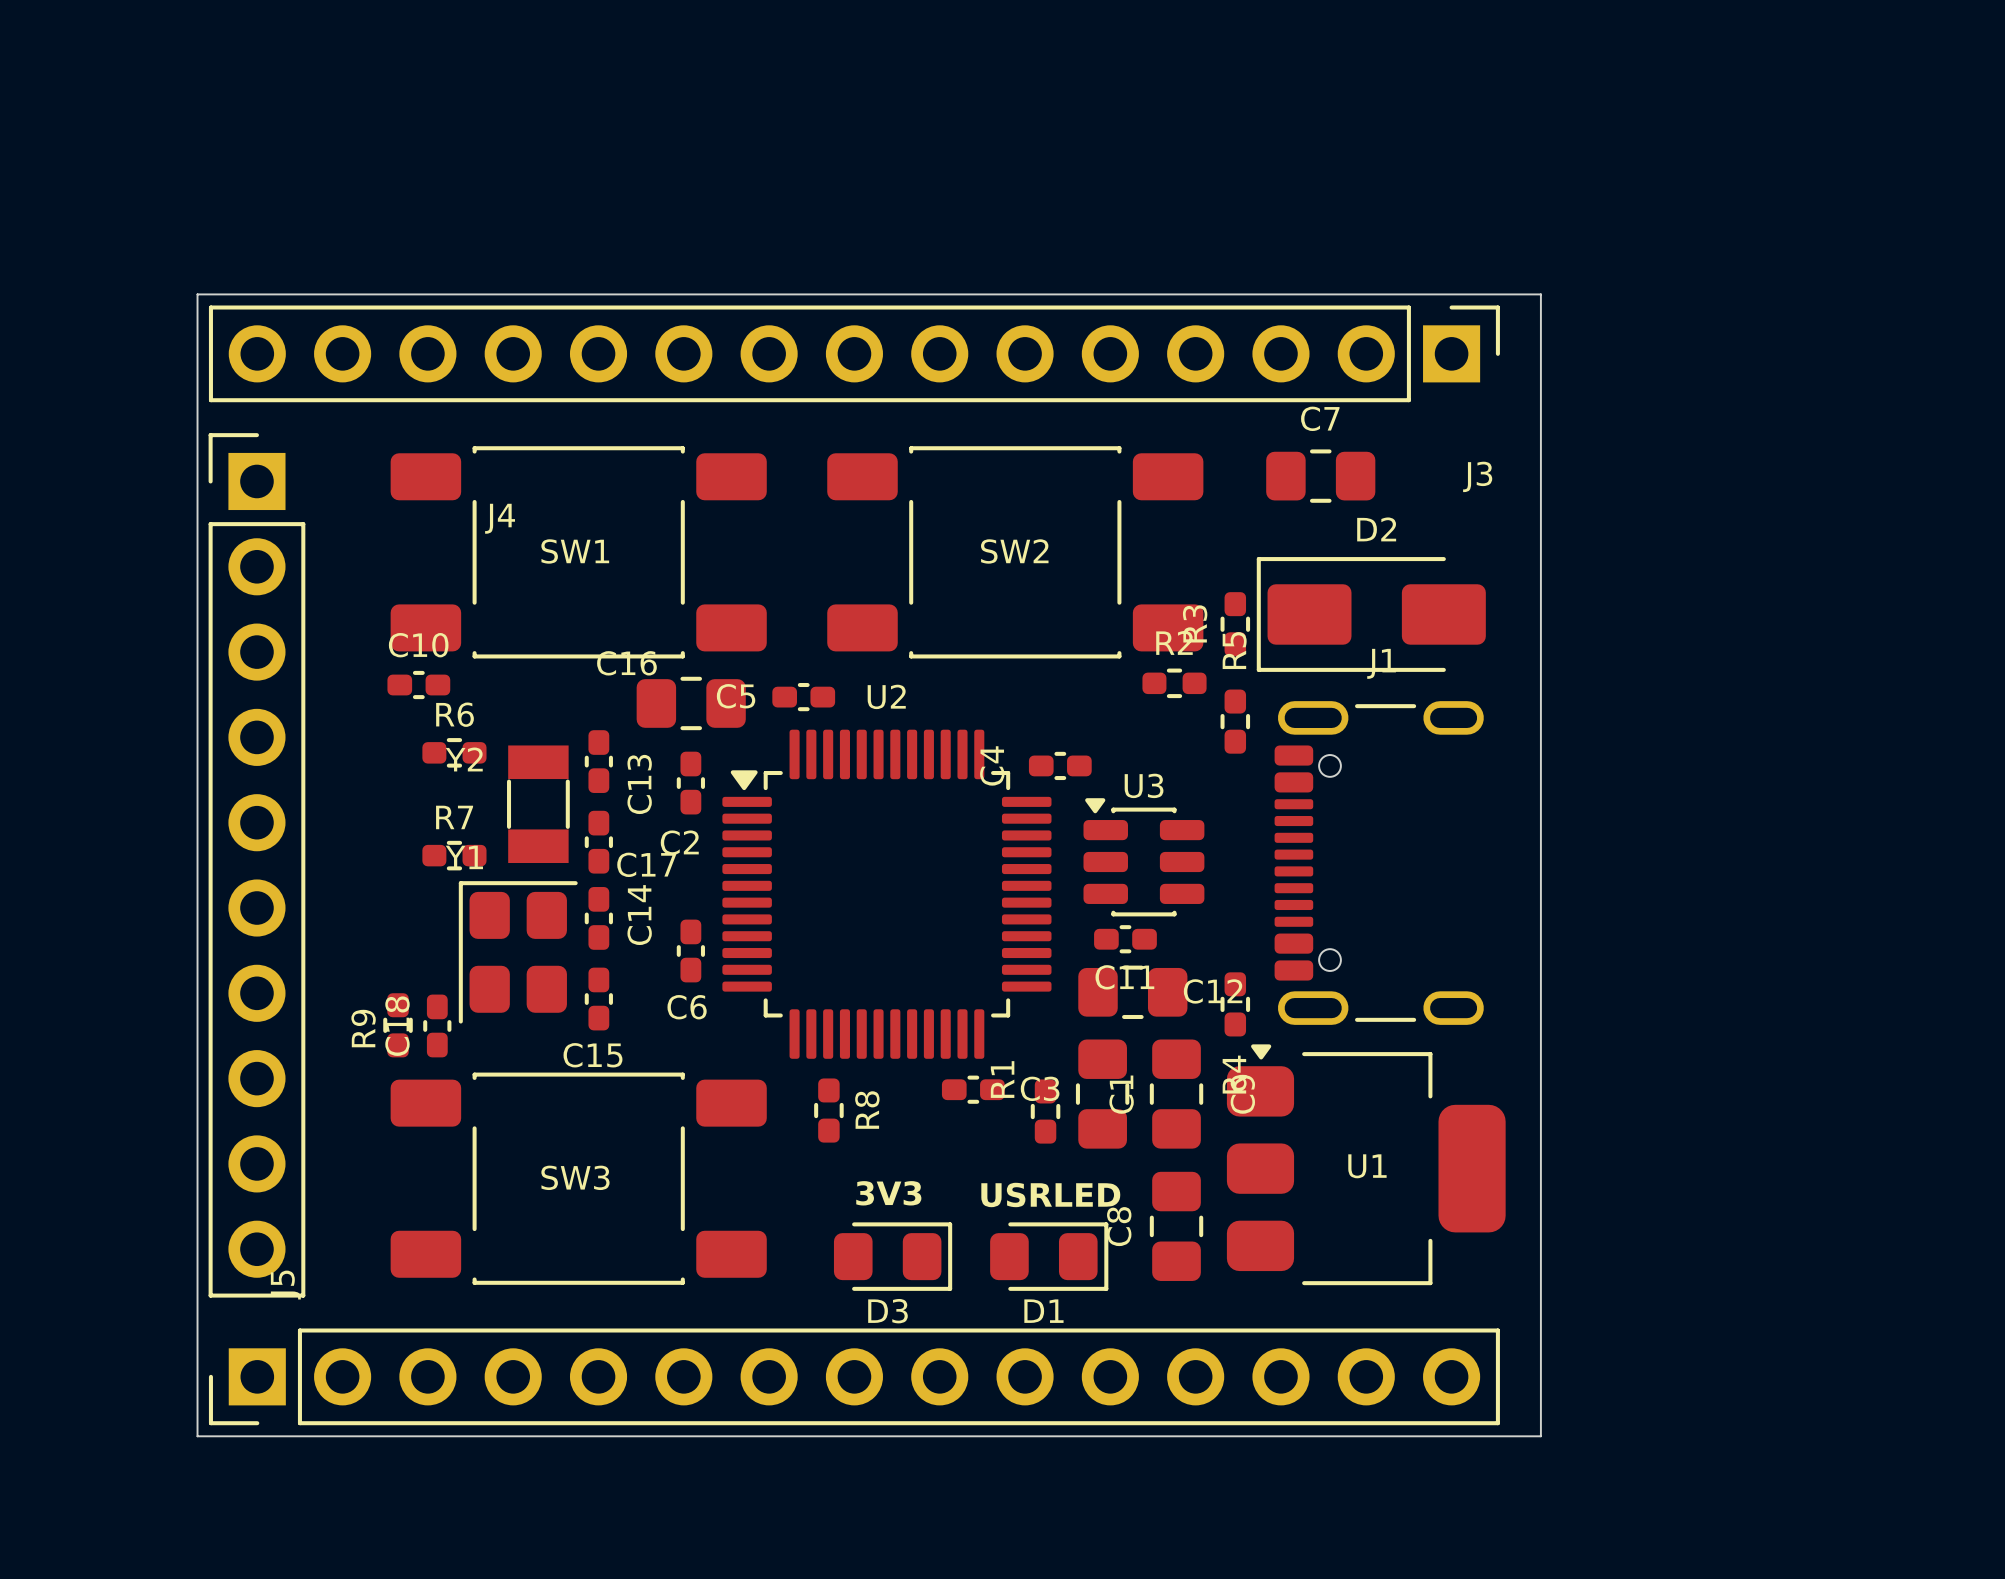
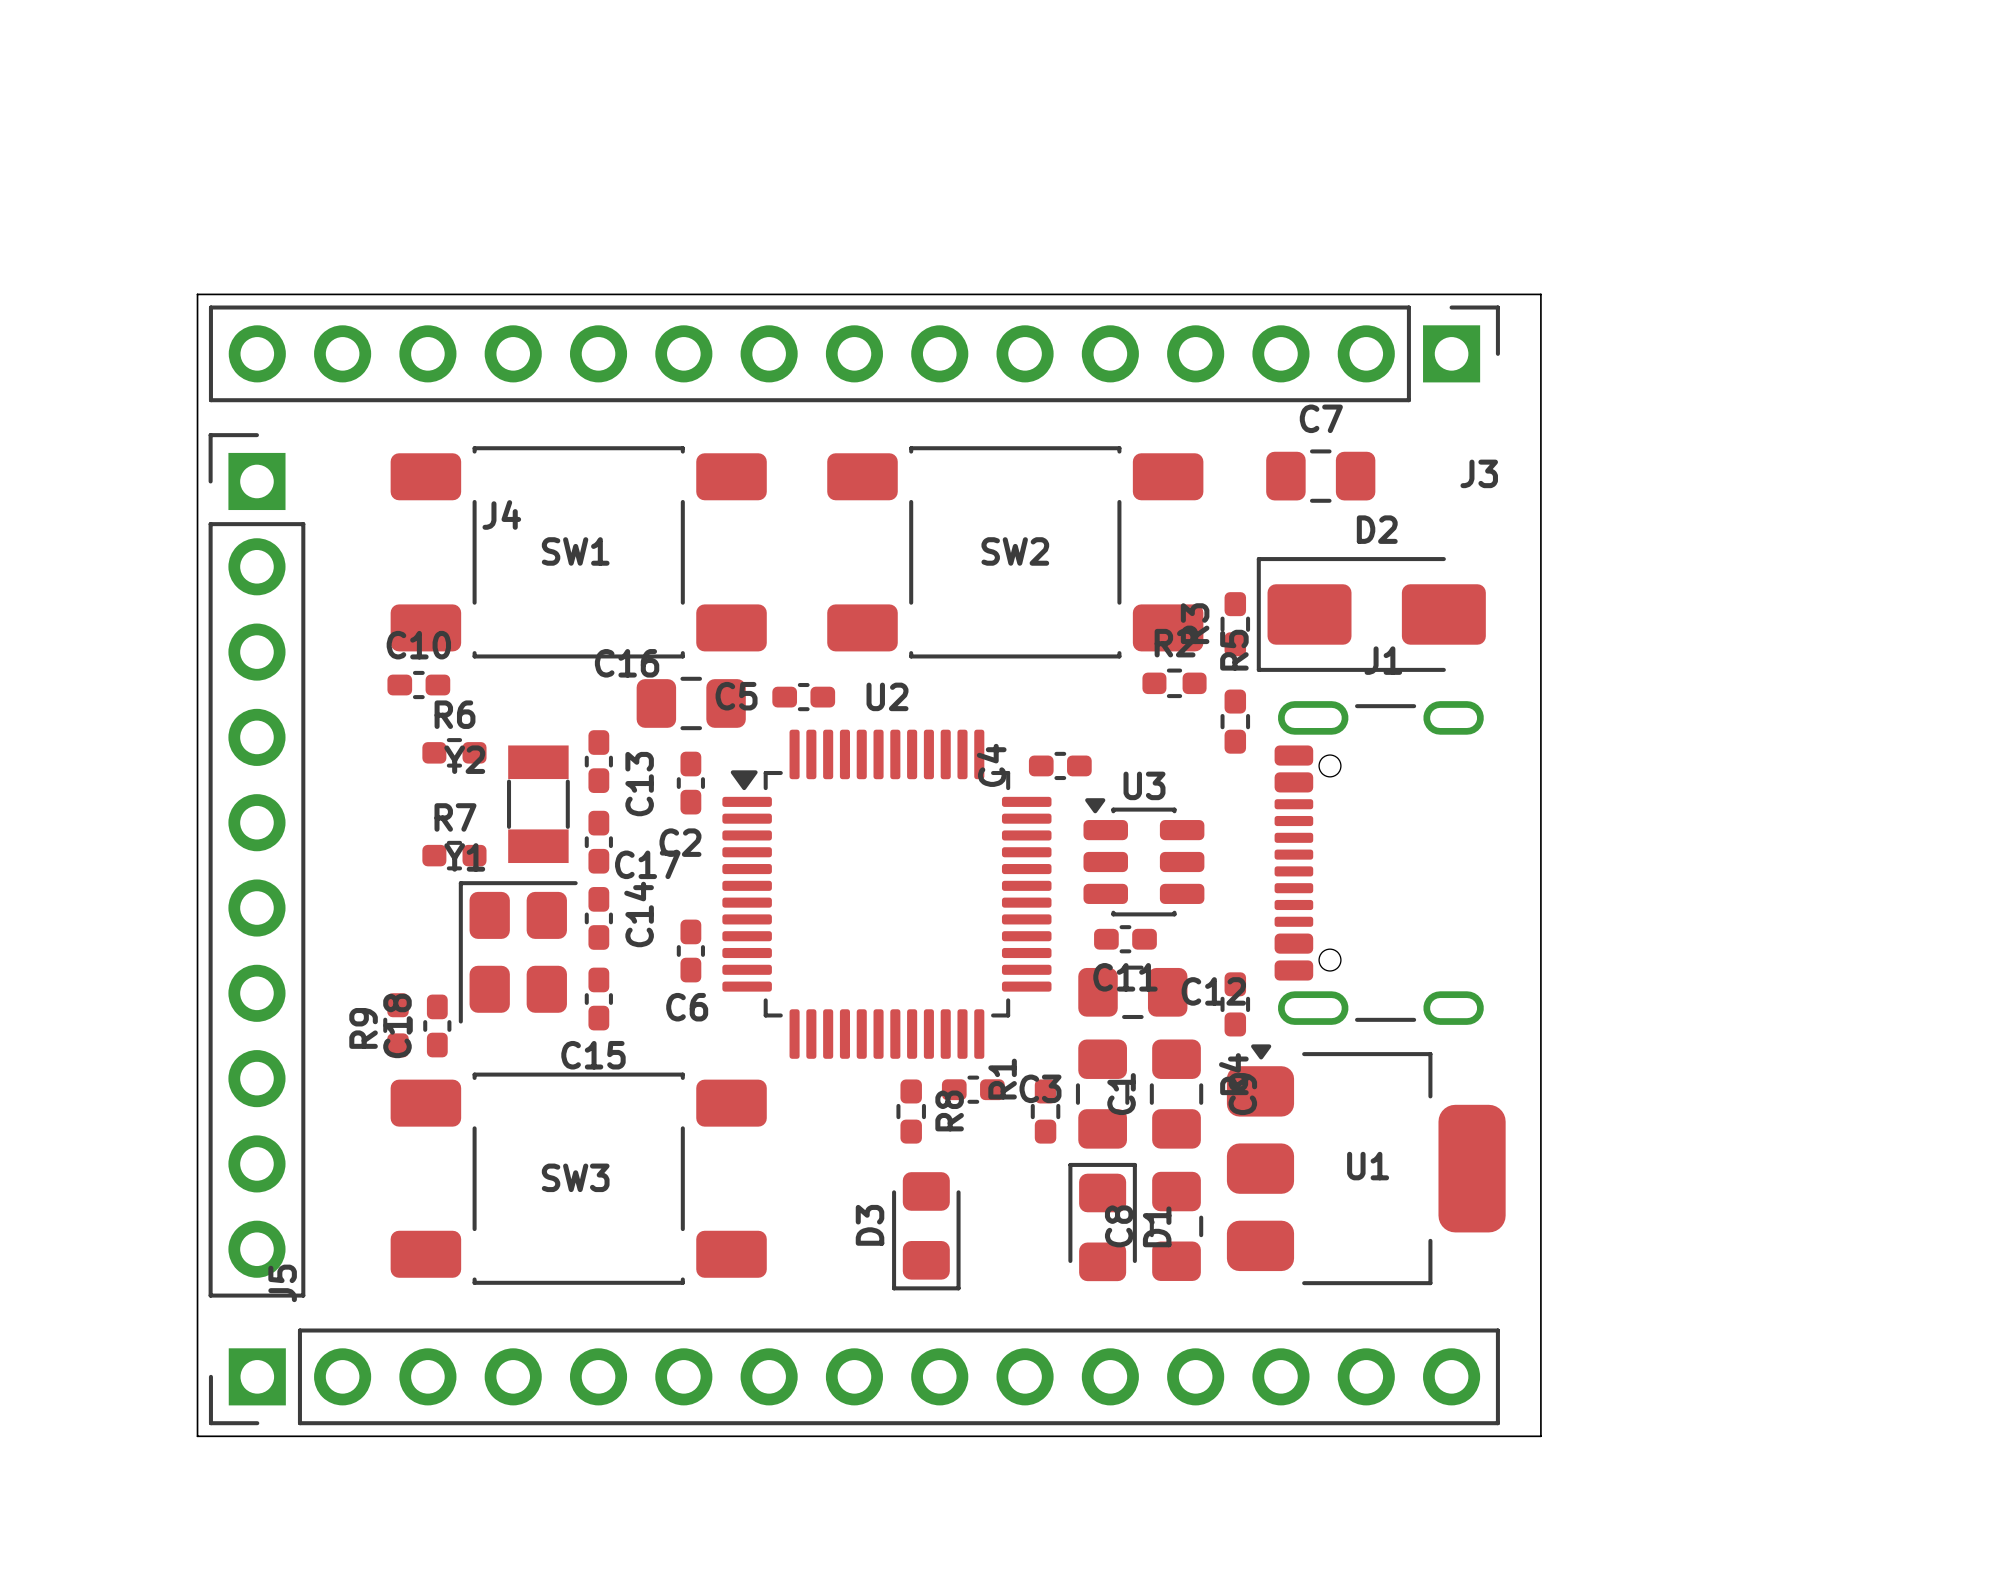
R8 position: (828, 1110) -> (911, 1111)
text: 3V3 (888, 1193) -> none
text: USRLED (1050, 1194) -> none
D3 rotation: 0° (893, 1256) -> 90° clockwise (926, 1231)
D1 rotation: 0° (1049, 1256) -> 90° counterclockwise (1102, 1222)

